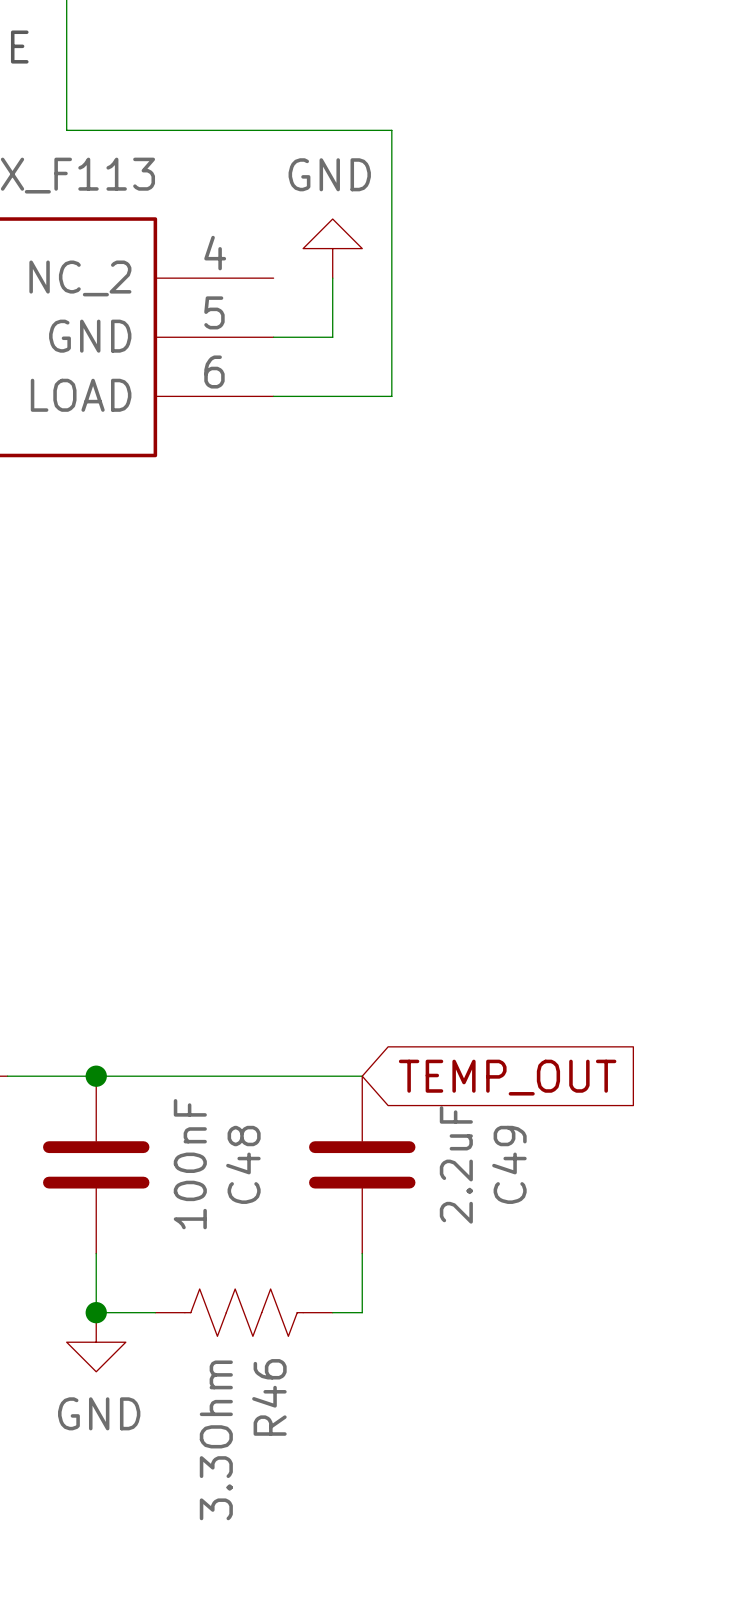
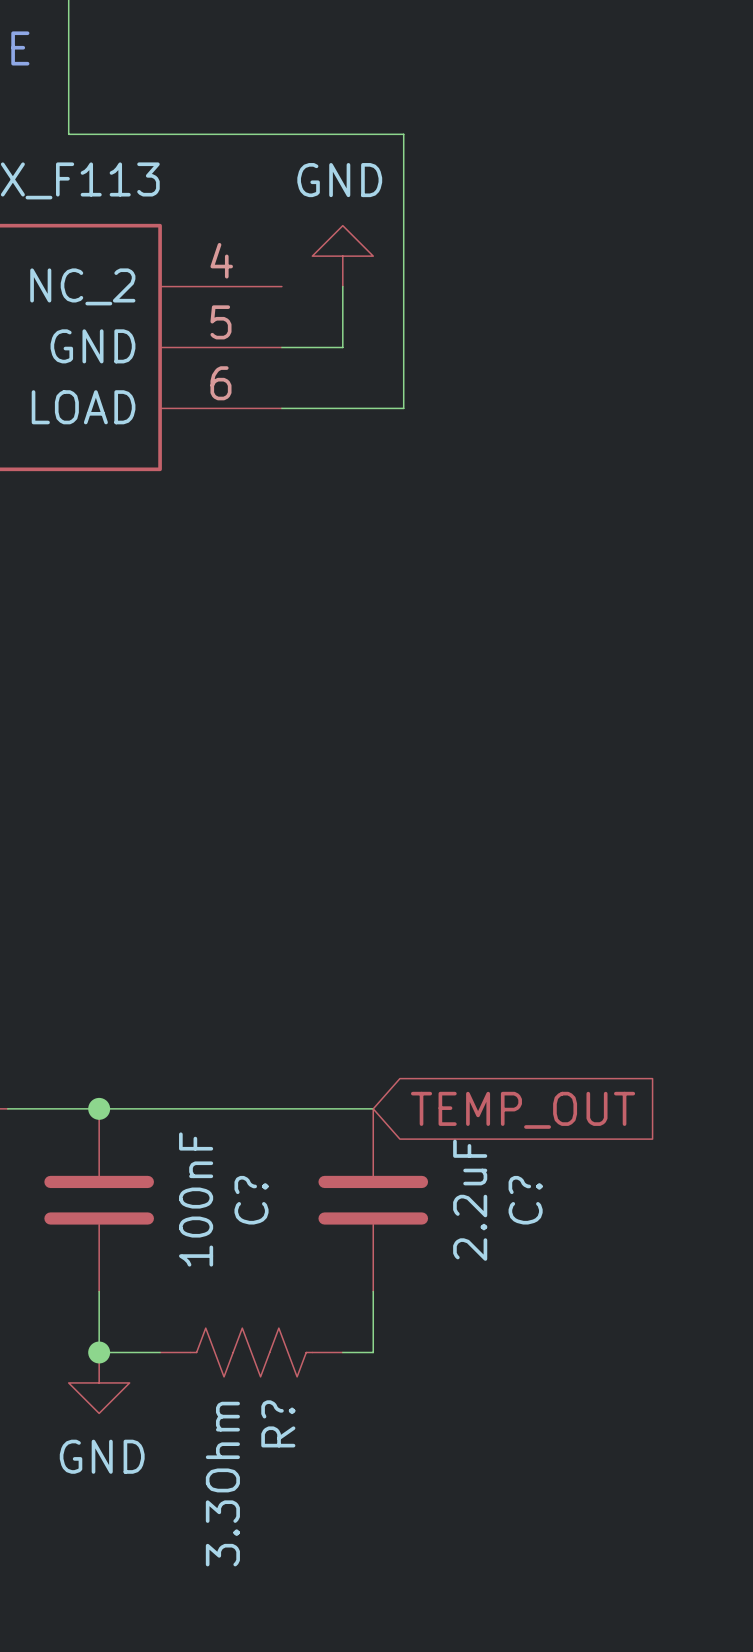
C48 name: C48 (243, 1164) -> C? (251, 1200)
C49 name: C49 (509, 1164) -> C? (525, 1200)
R46 name: R46 (269, 1397) -> R? (278, 1423)

